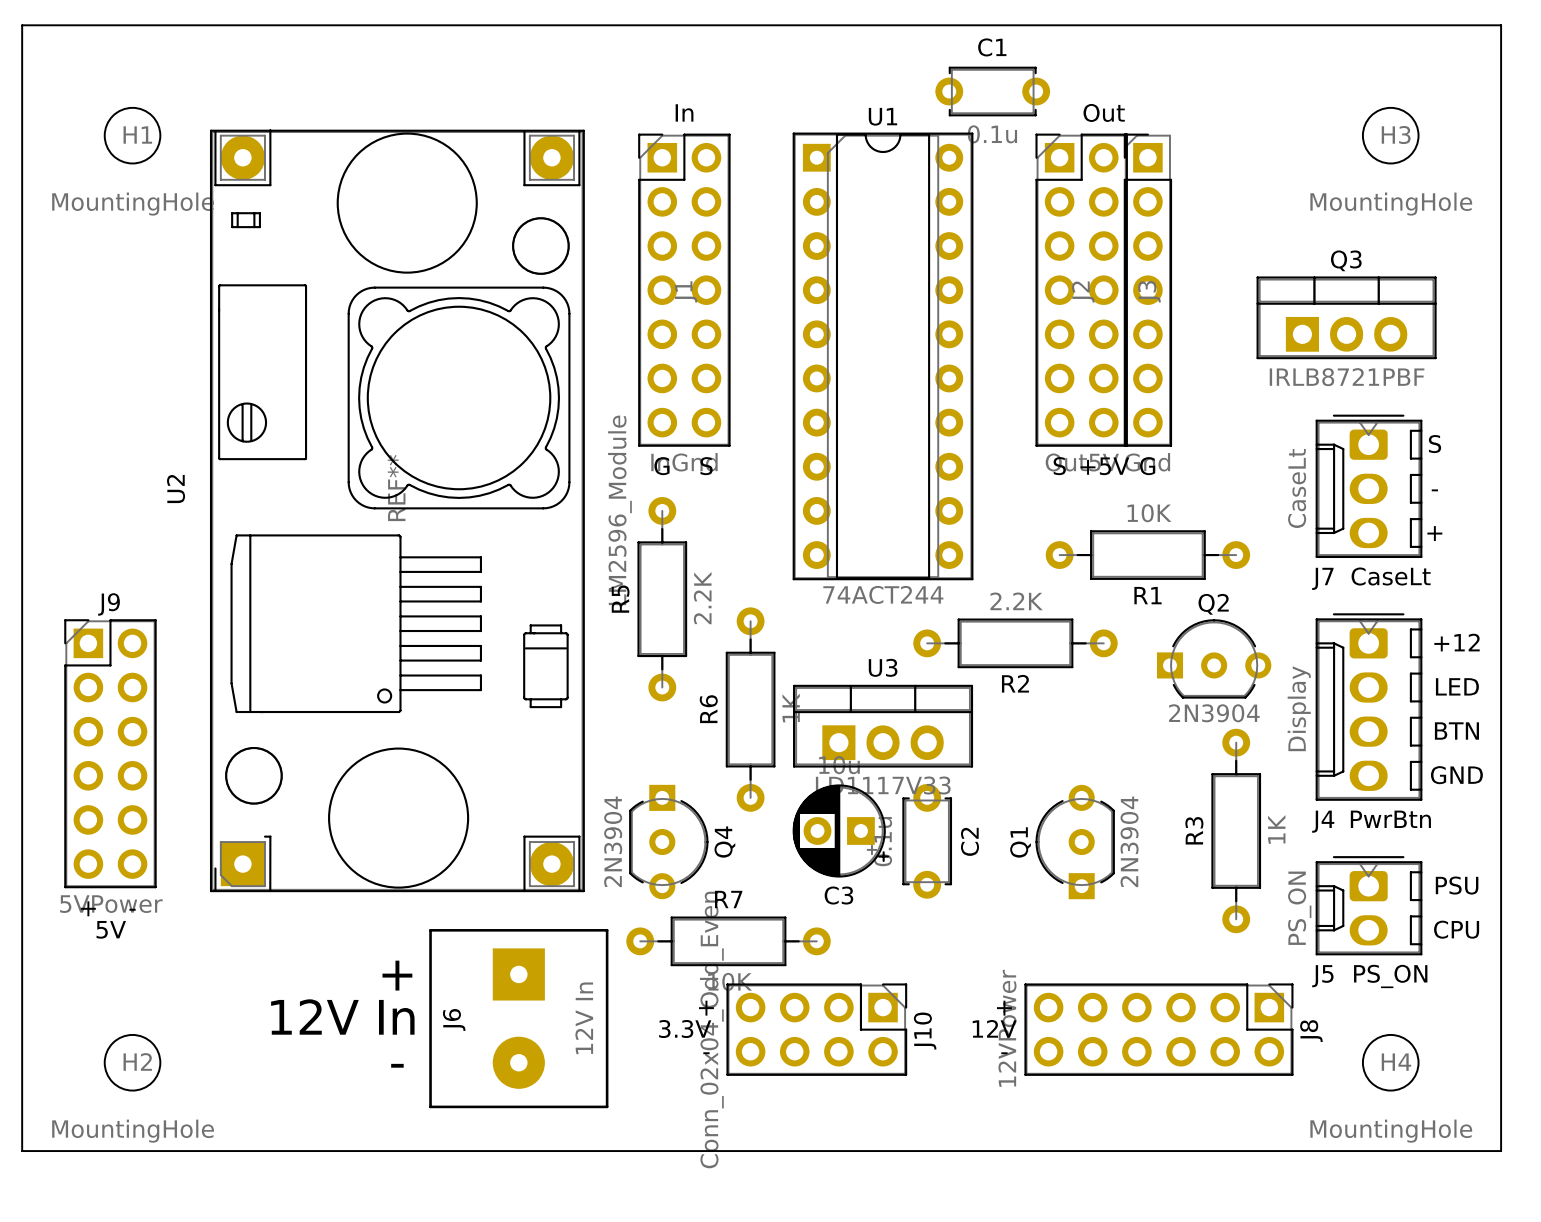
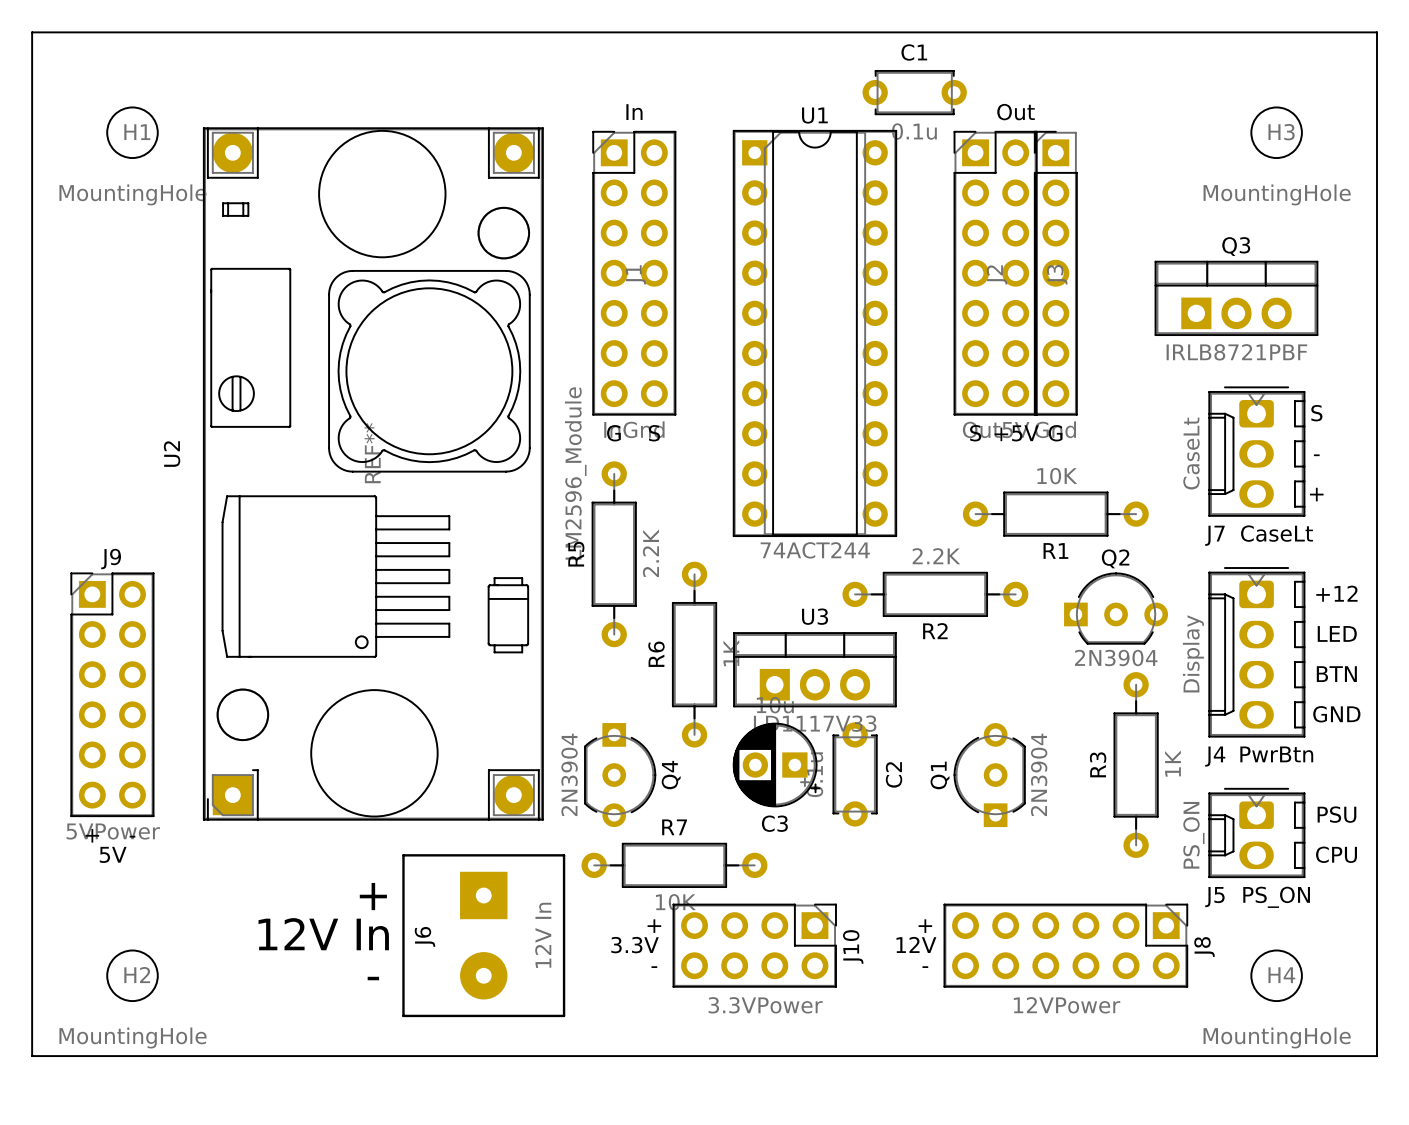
J8 value rotation: 0° (1007, 1028) -> 90° clockwise (1067, 1005)
J8 value position: 12VPower (1007, 1028) -> 12VPower (1067, 1005)
J10 value: Conn_02x04_Odd_Even (711, 1029) -> 3.3VPower (765, 1005)

